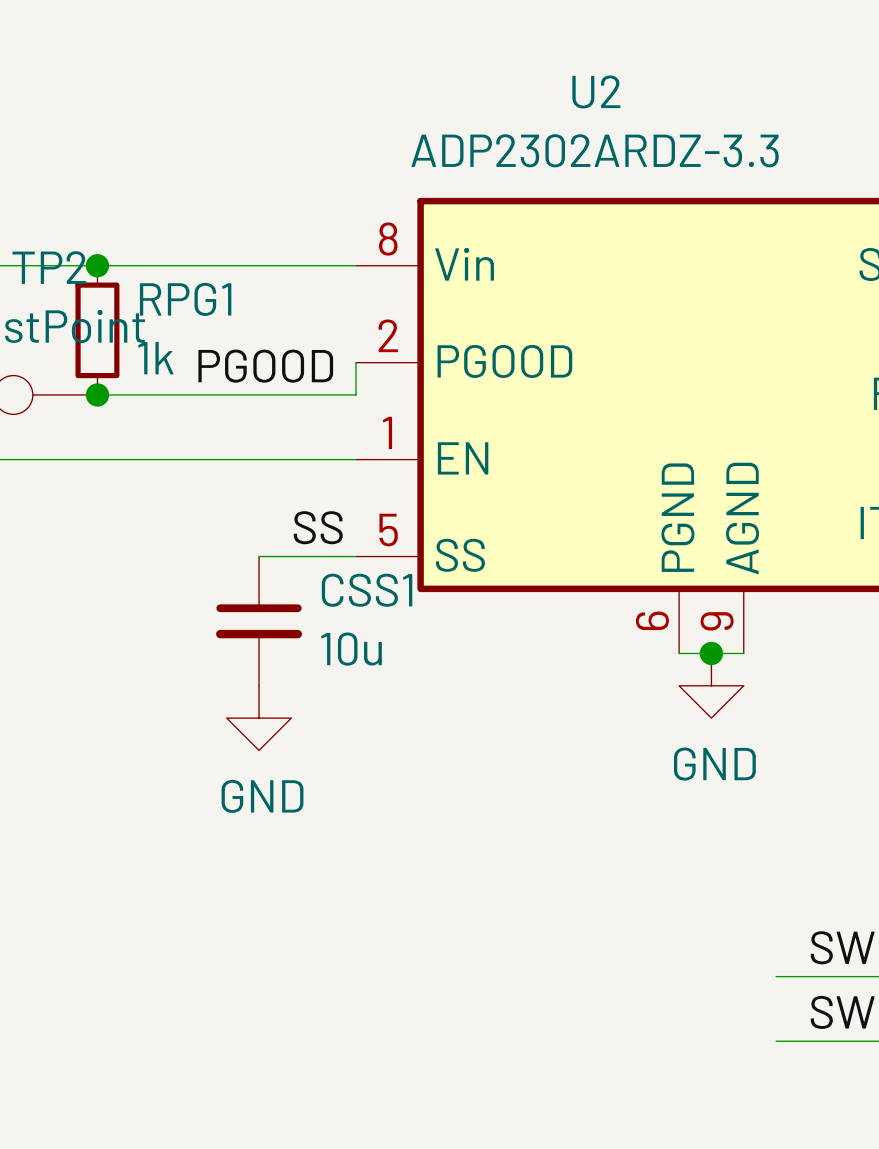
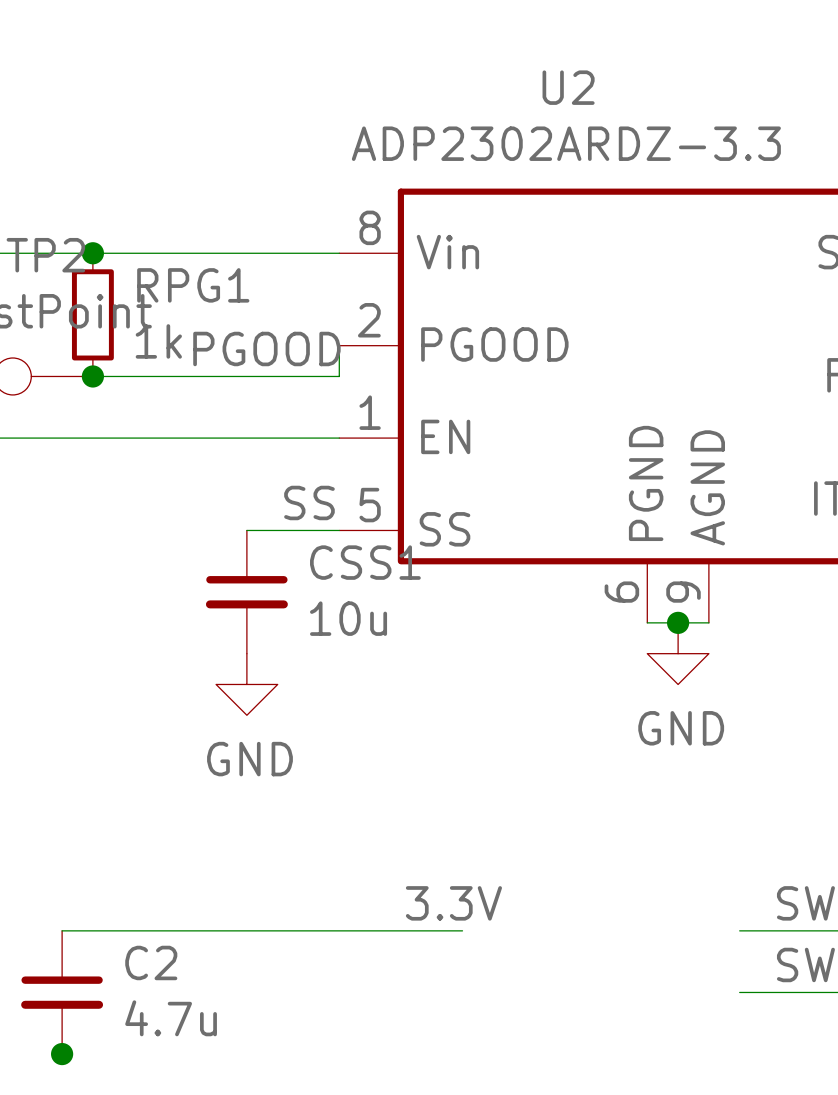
label: none -> 3.3V (453, 903)
wire: none -> (62, 930) (462, 930)
C2: none -> 4.7u (62, 992)
junction: none -> (62, 1054)

